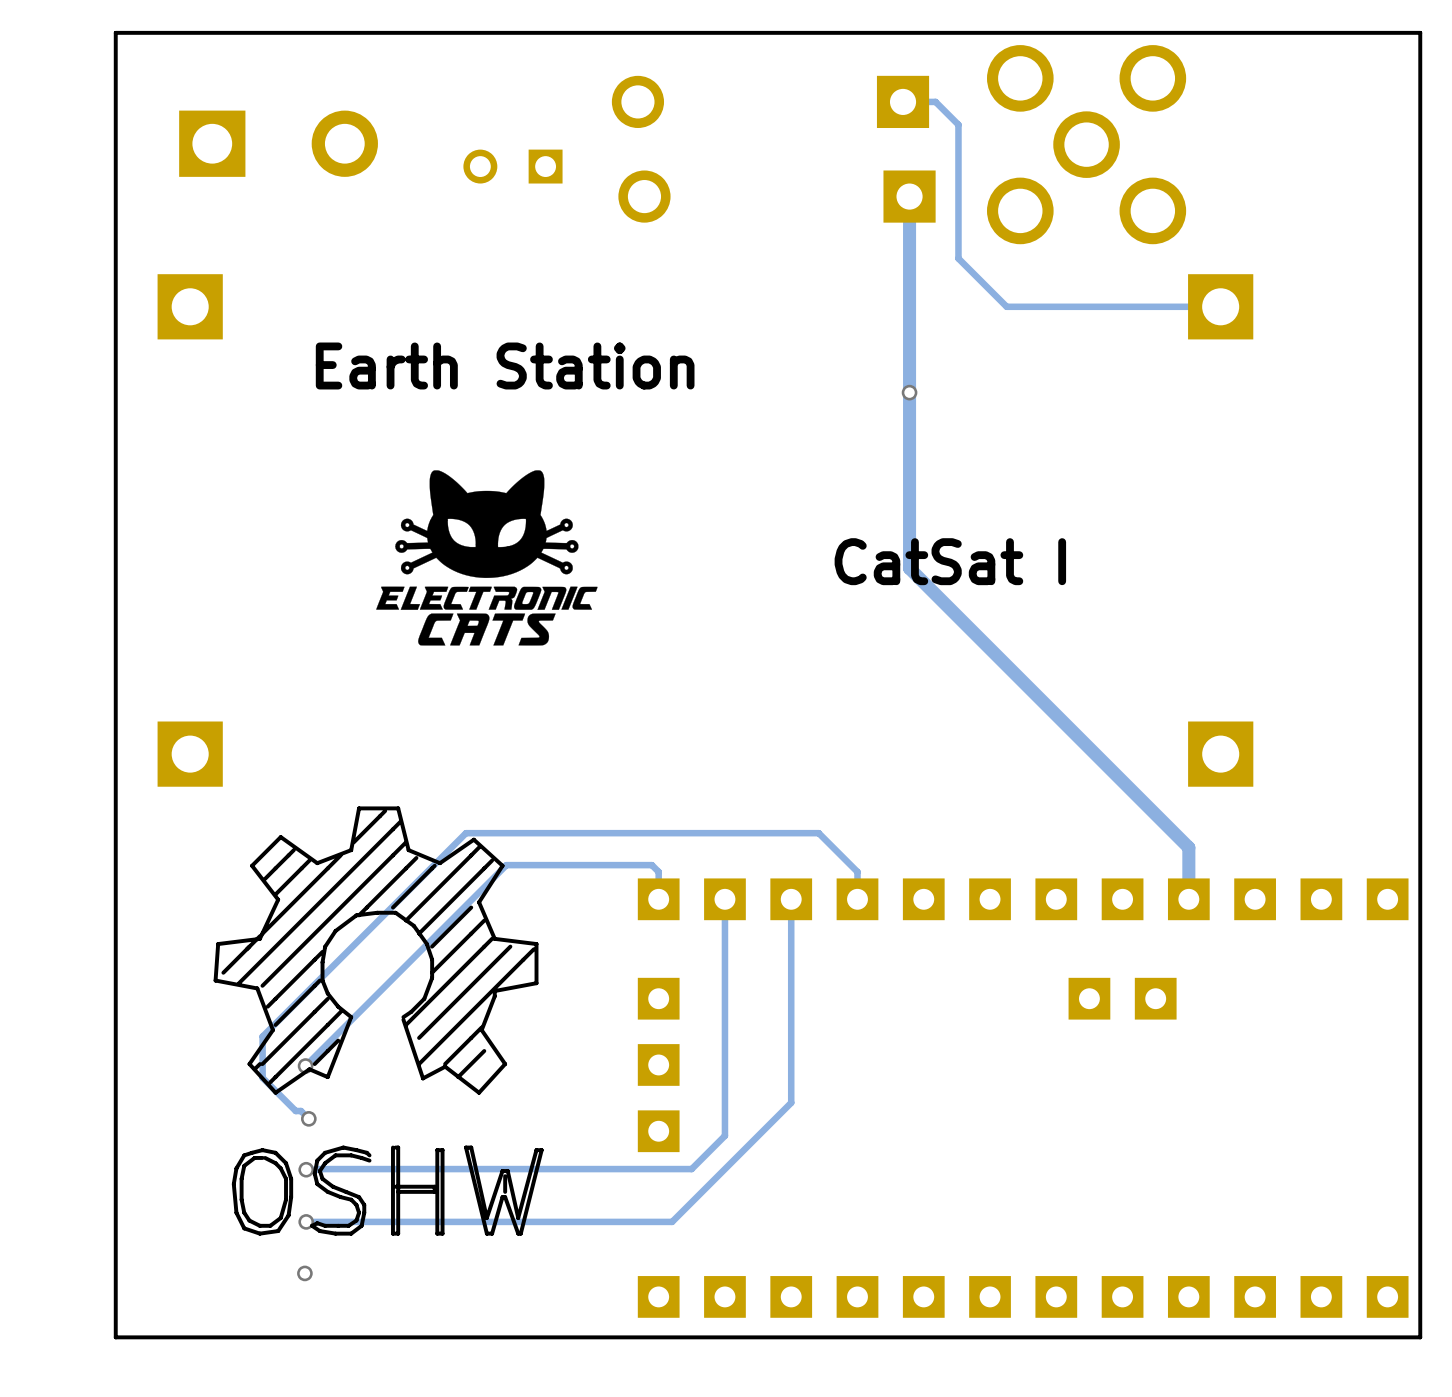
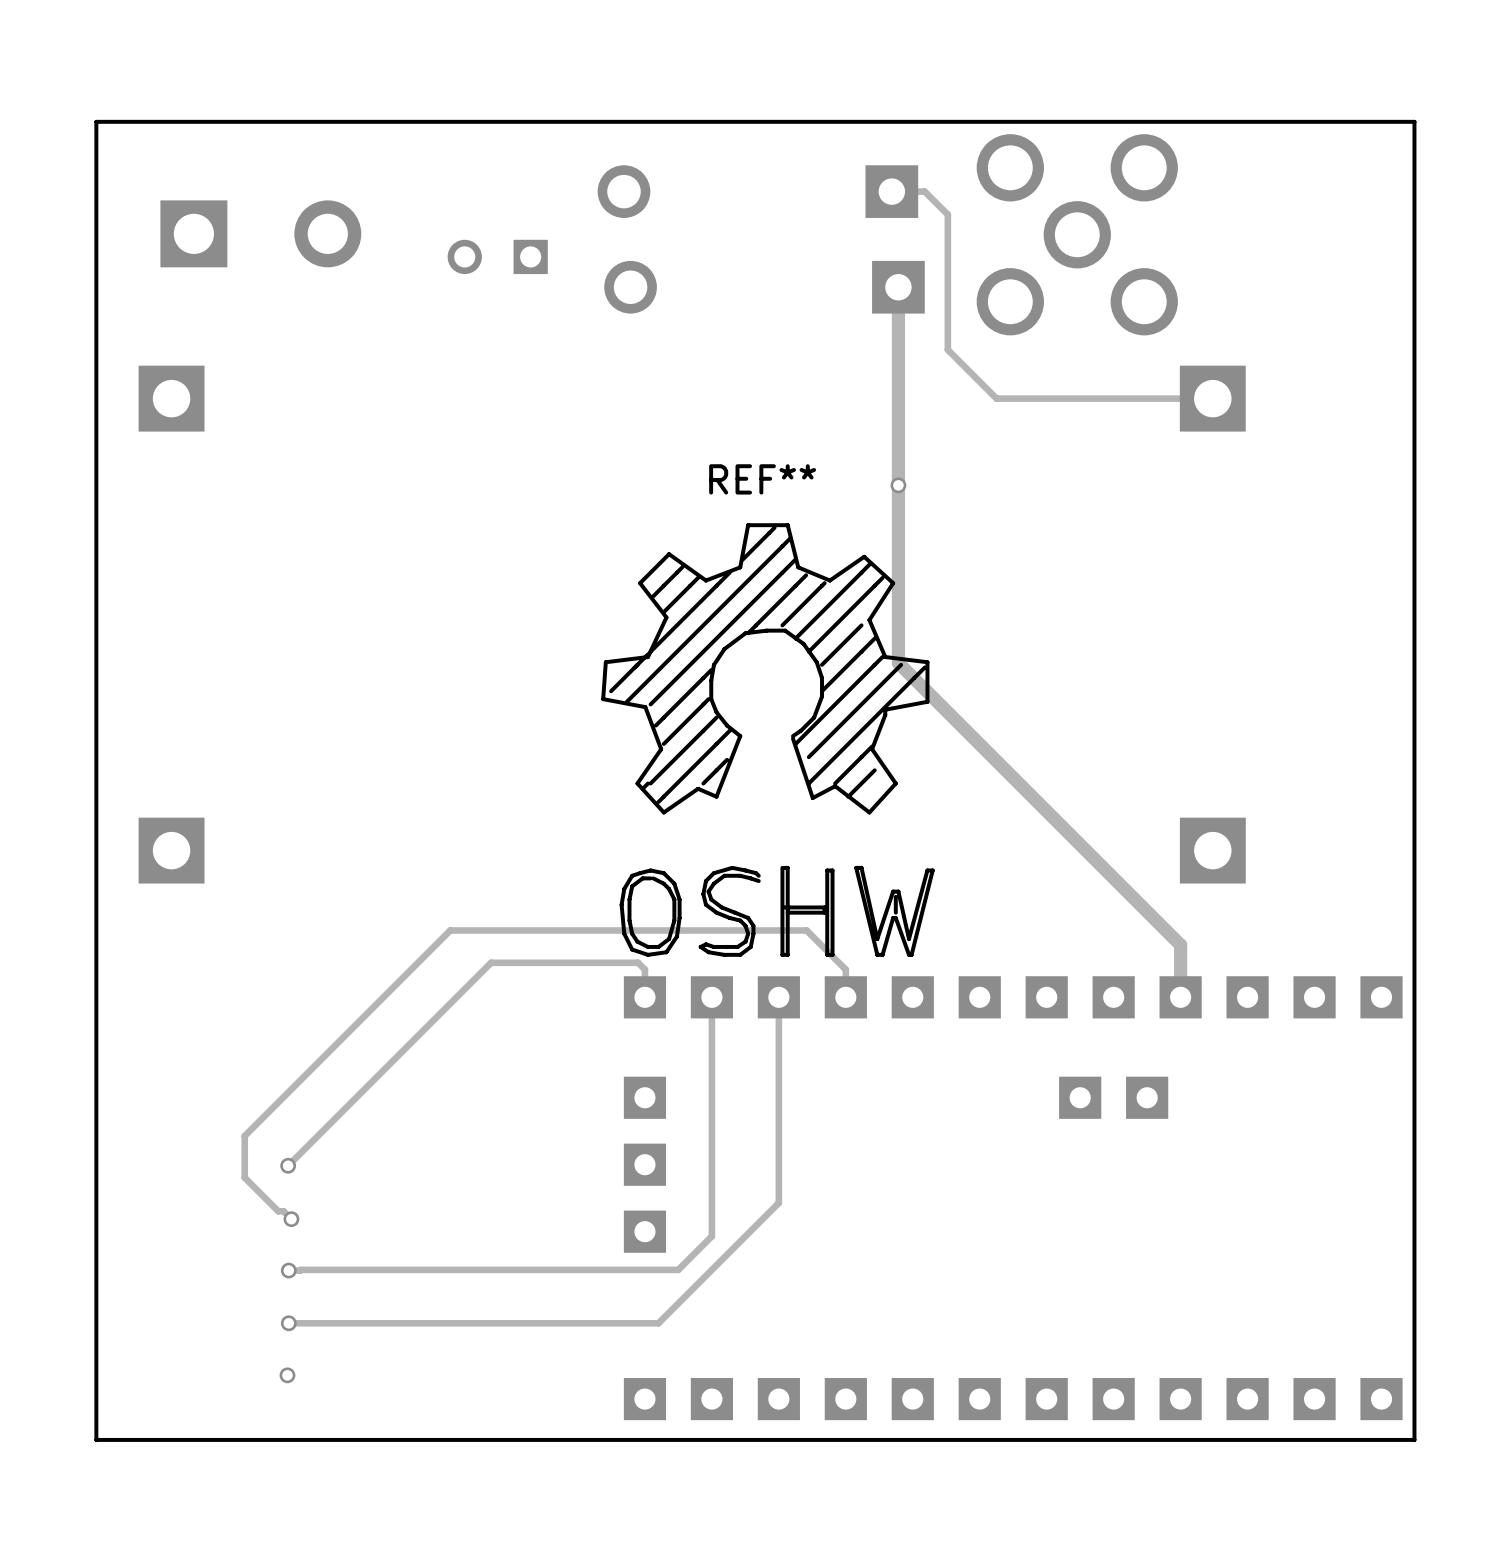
text: Earth Station (505, 365) -> none
drawing: [376, 470, 598, 646] -> none
text: CatSat I (950, 561) -> none
REF**: none -> (767, 740)
drawing: [213, 806, 544, 1236] -> none

